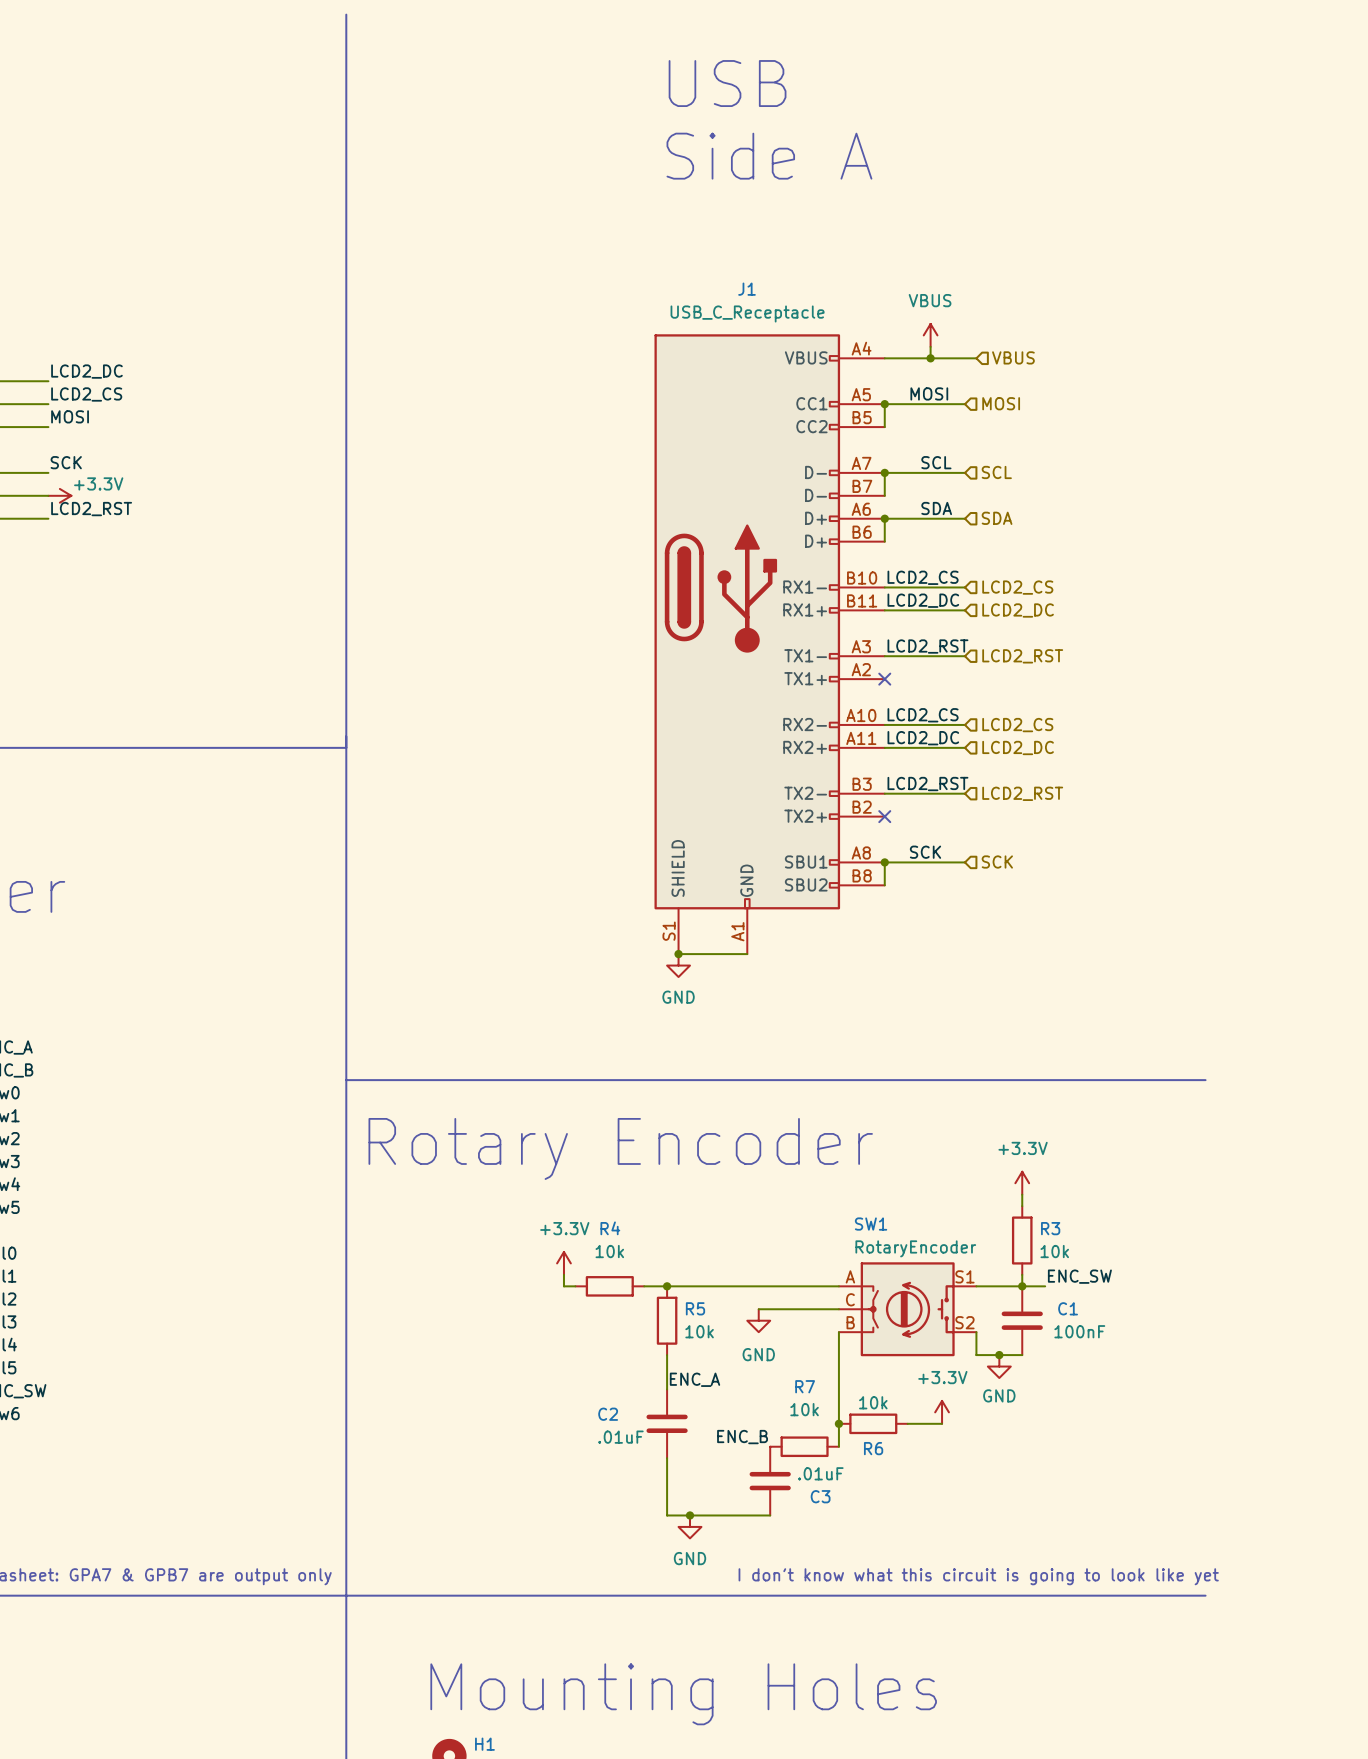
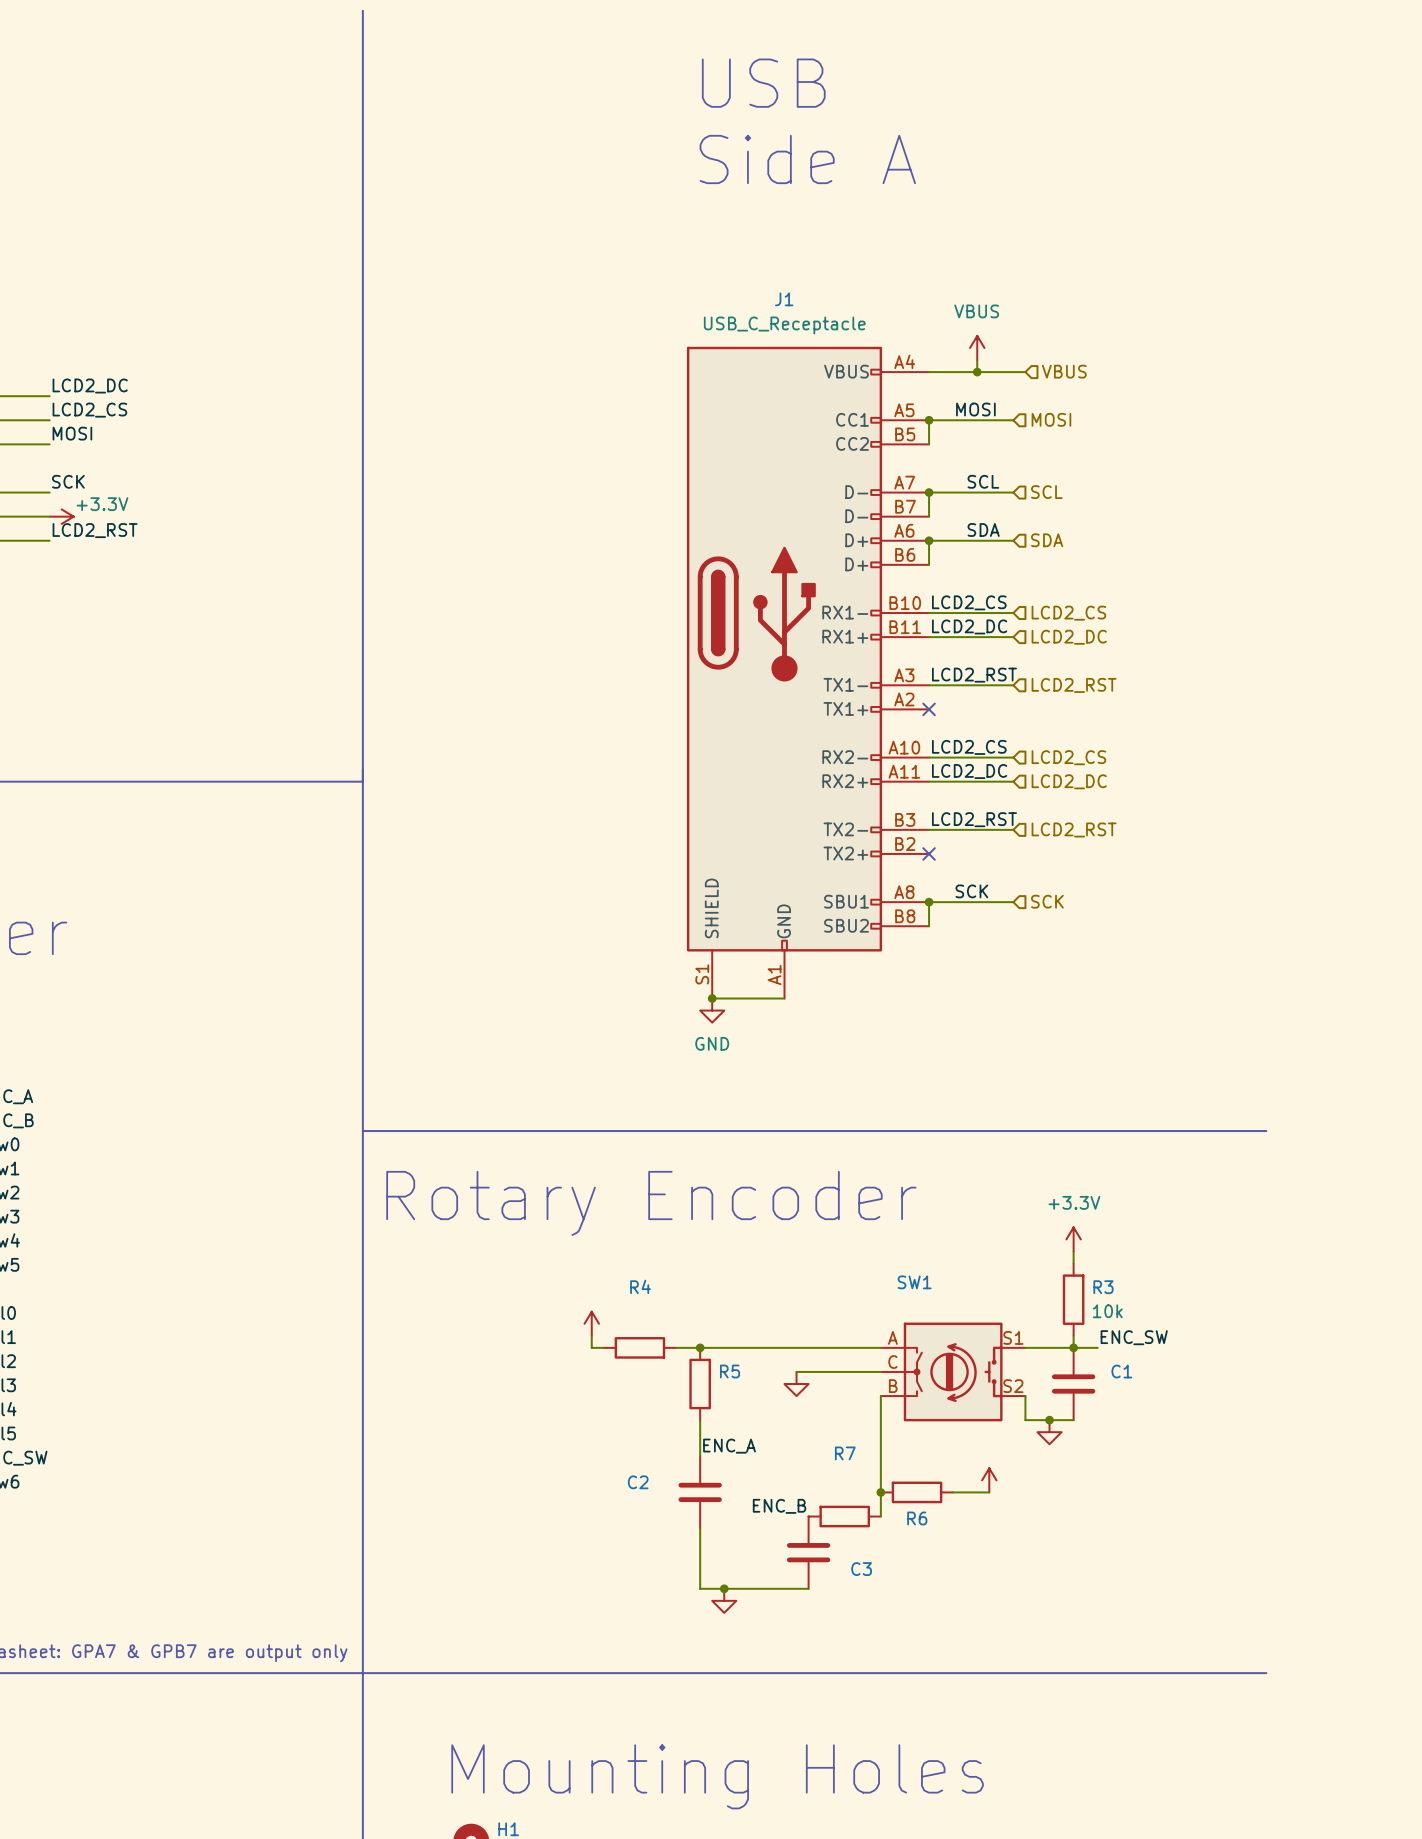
power symbol text: +3.3V (564, 1228) -> none
SW1 value: RotaryEncoder (915, 1248) -> none
R4 value: 10k (609, 1251) -> none
R5 value: 10k (699, 1331) -> none
C1 value: 100nF (1079, 1331) -> none
power symbol text: GND (758, 1354) -> none
power symbol text: +3.3V (942, 1377) -> none
power symbol text: GND (999, 1395) -> none
R6 value: 10k (873, 1402) -> none
R7 value: 10k (804, 1409) -> none
C2 value: .01uF (620, 1437) -> none
C3 value: .01uF (820, 1473) -> none
power symbol text: GND (690, 1558) -> none
text: I don't know what this circuit is going to look like yet (978, 1576) -> none

